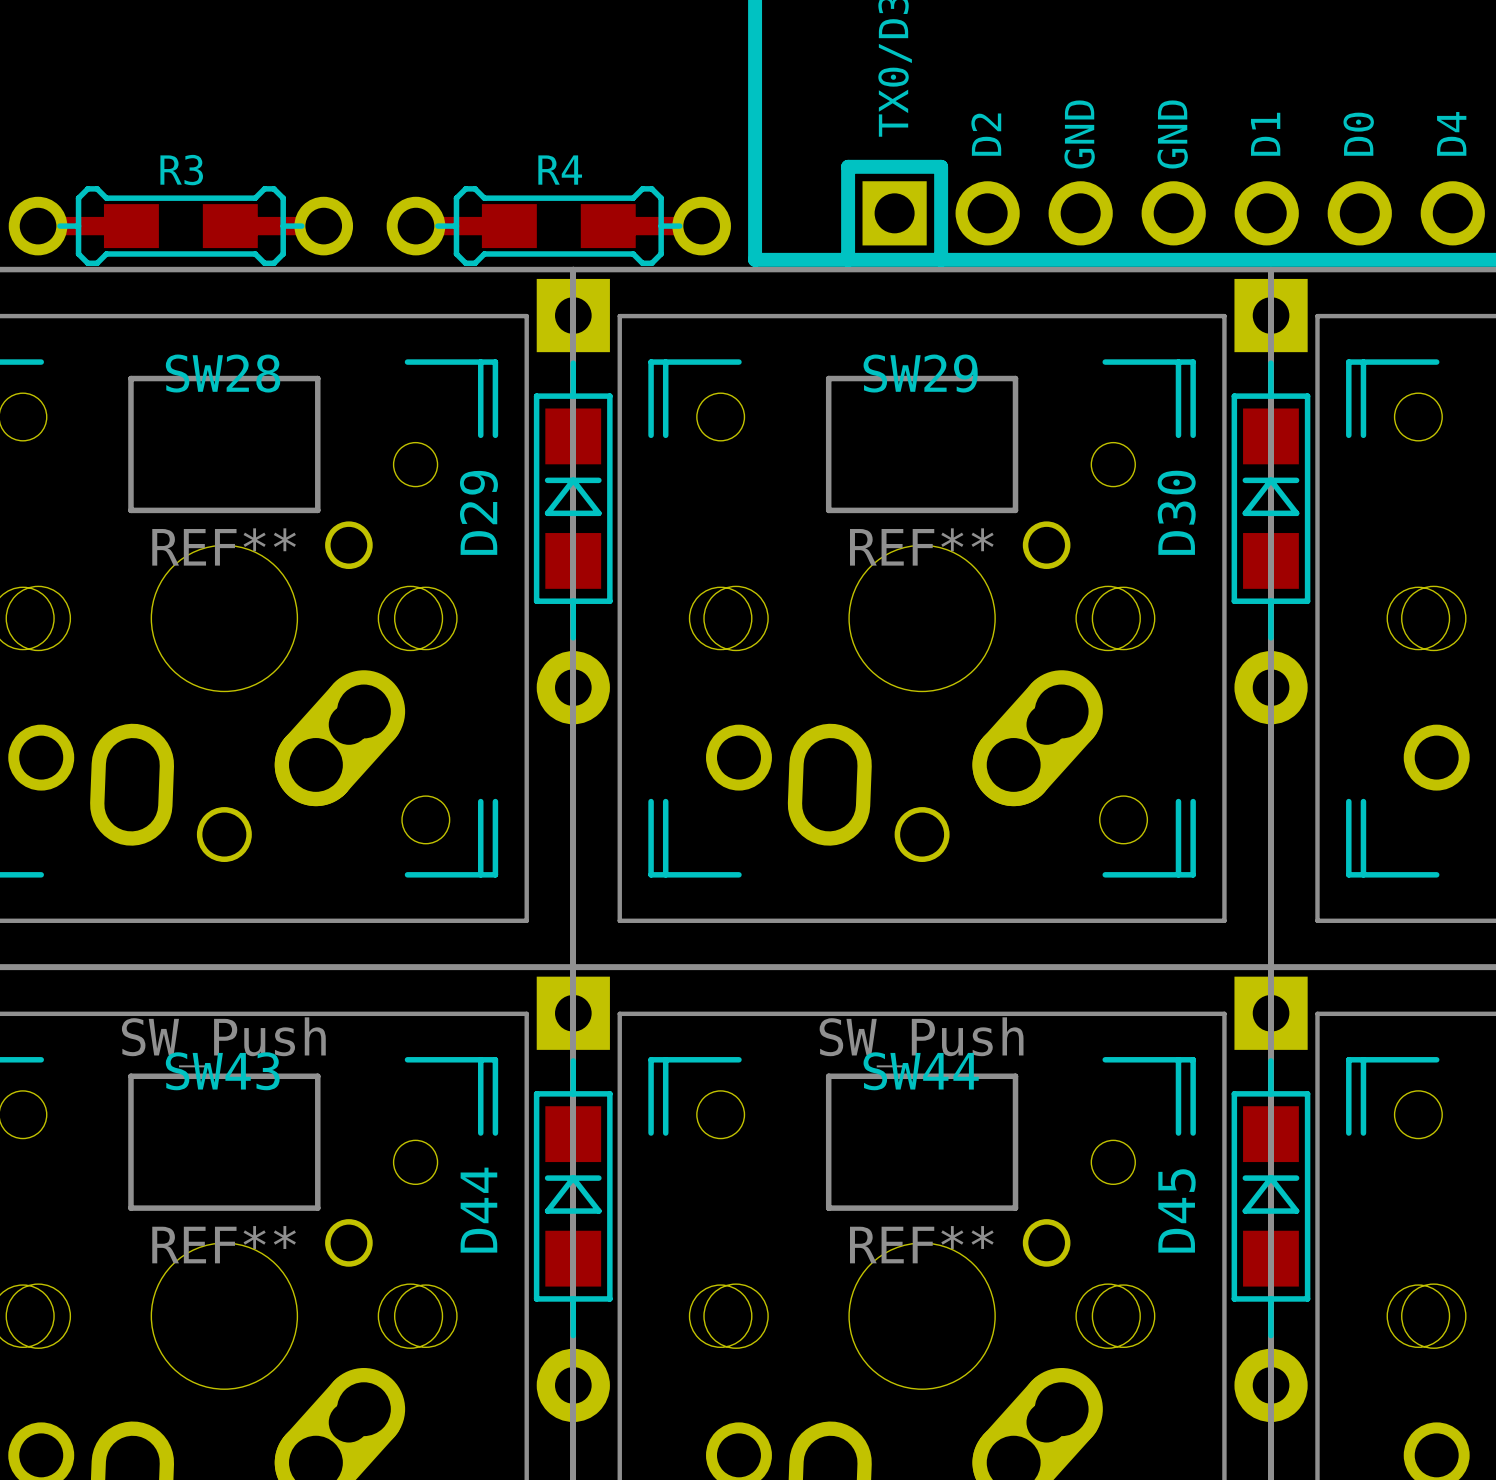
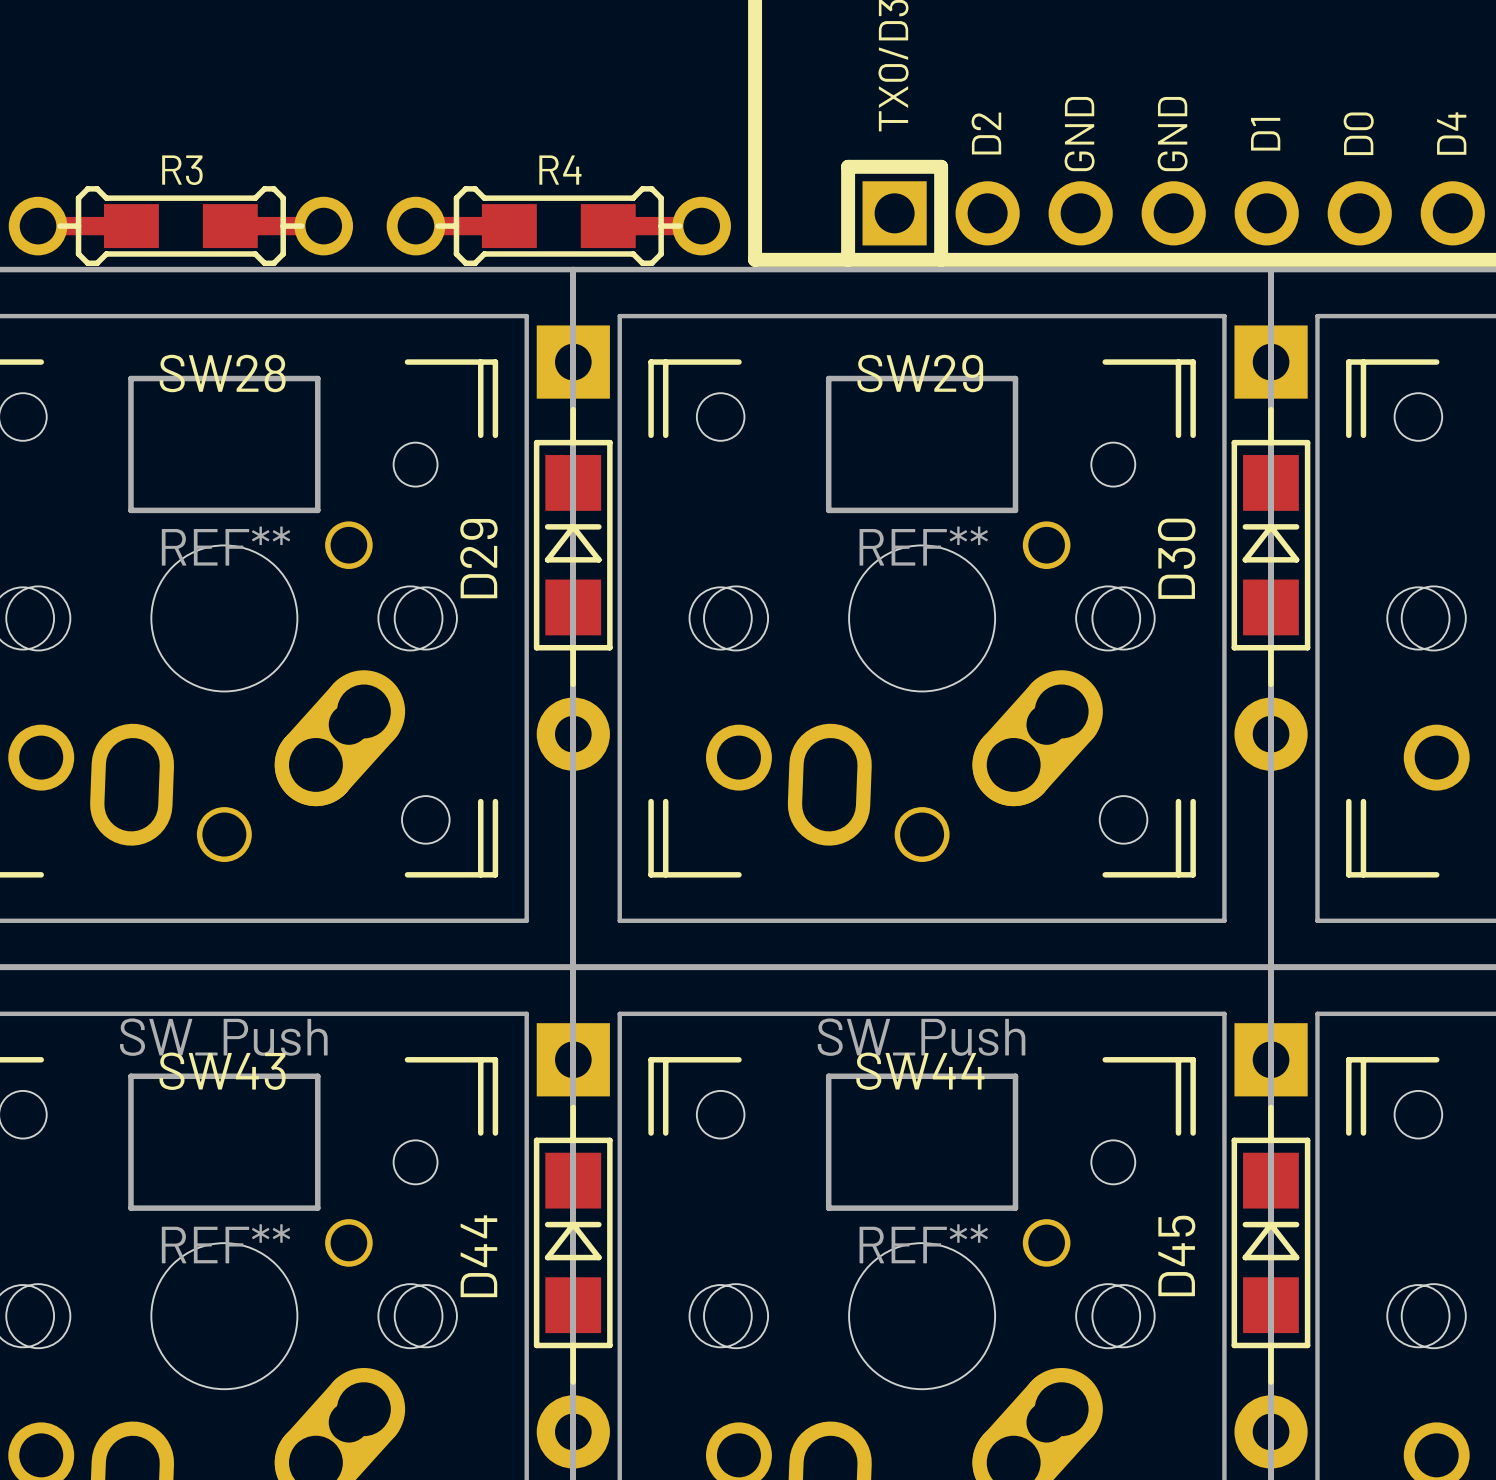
D29 position: (573, 501) -> (573, 548)
D30 position: (1270, 501) -> (1270, 548)
D44 position: (573, 1199) -> (573, 1245)
D45 position: (1270, 1199) -> (1270, 1245)

